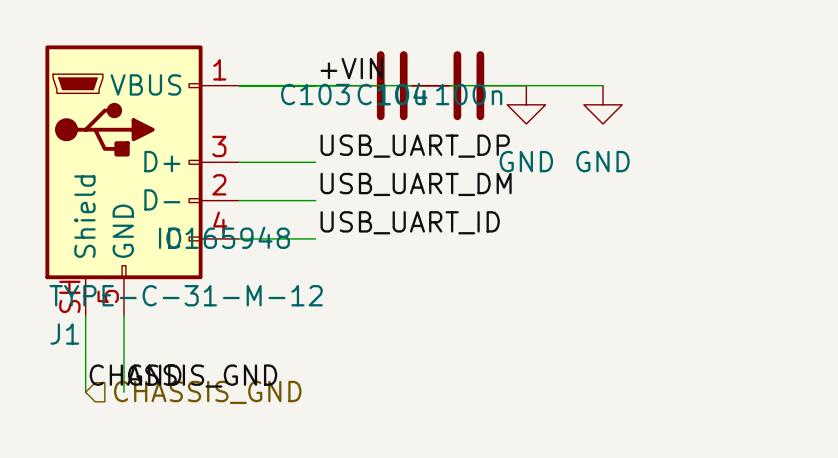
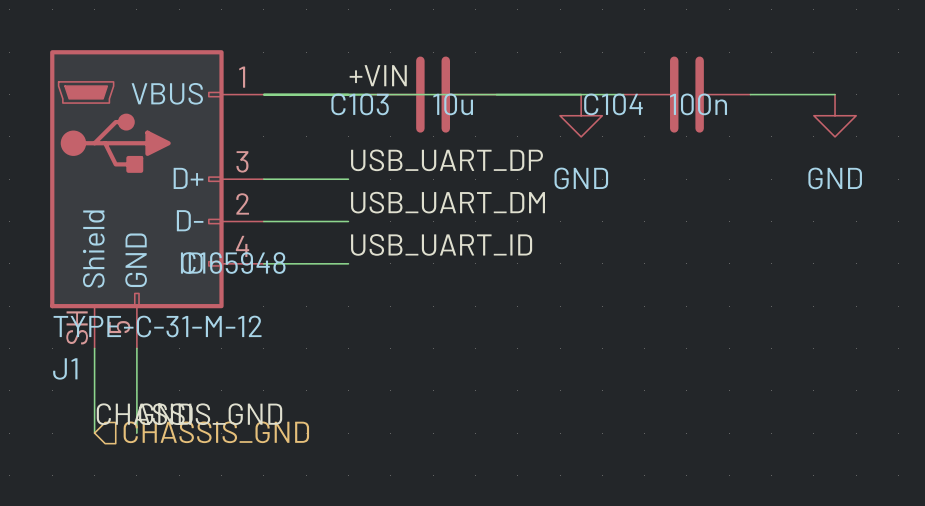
C104 position: (468, 85) -> (686, 94)
wire: none -> (750, 94) (835, 94)
power symbol position: GND (602, 104) -> GND (835, 115)

